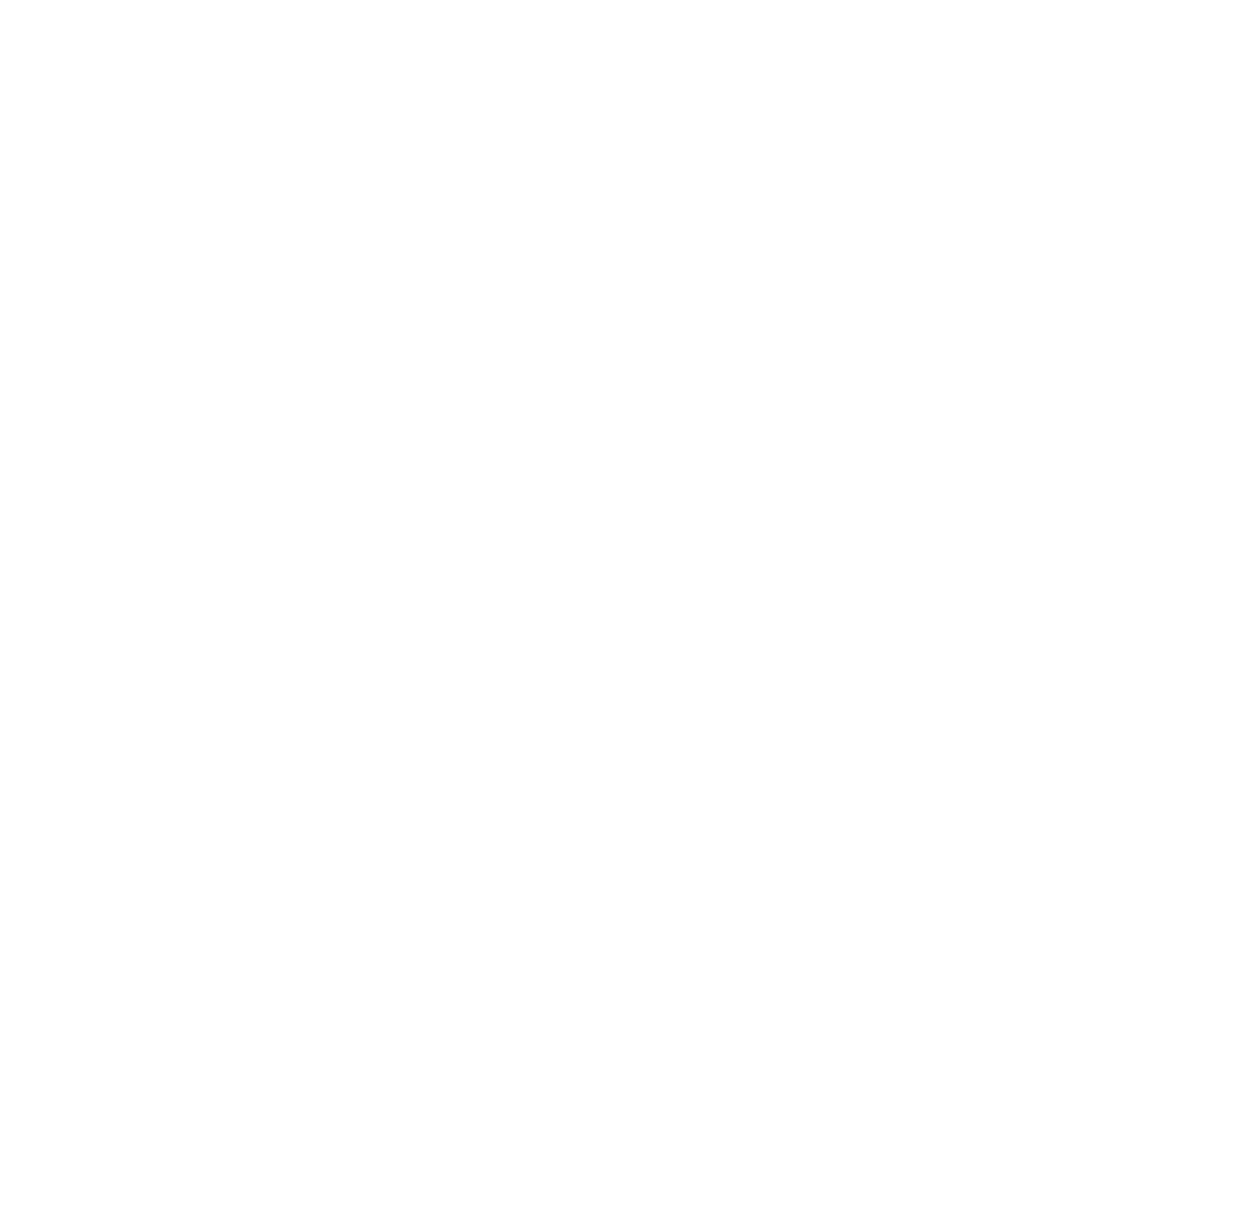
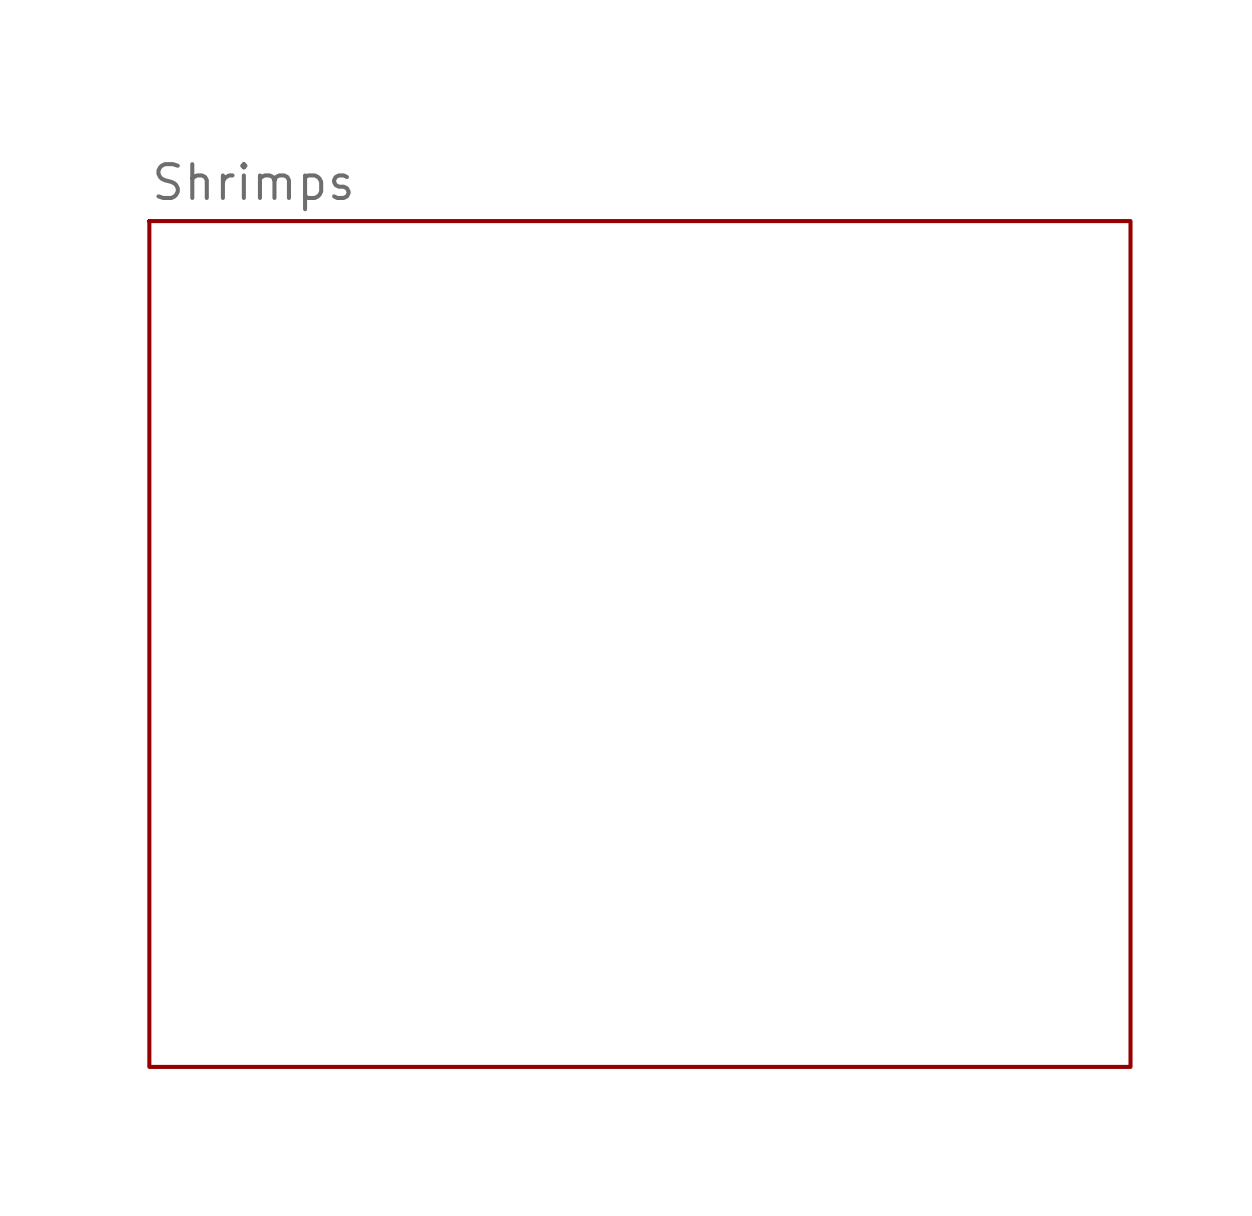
sheet Shrimps: none -> (639, 643)

